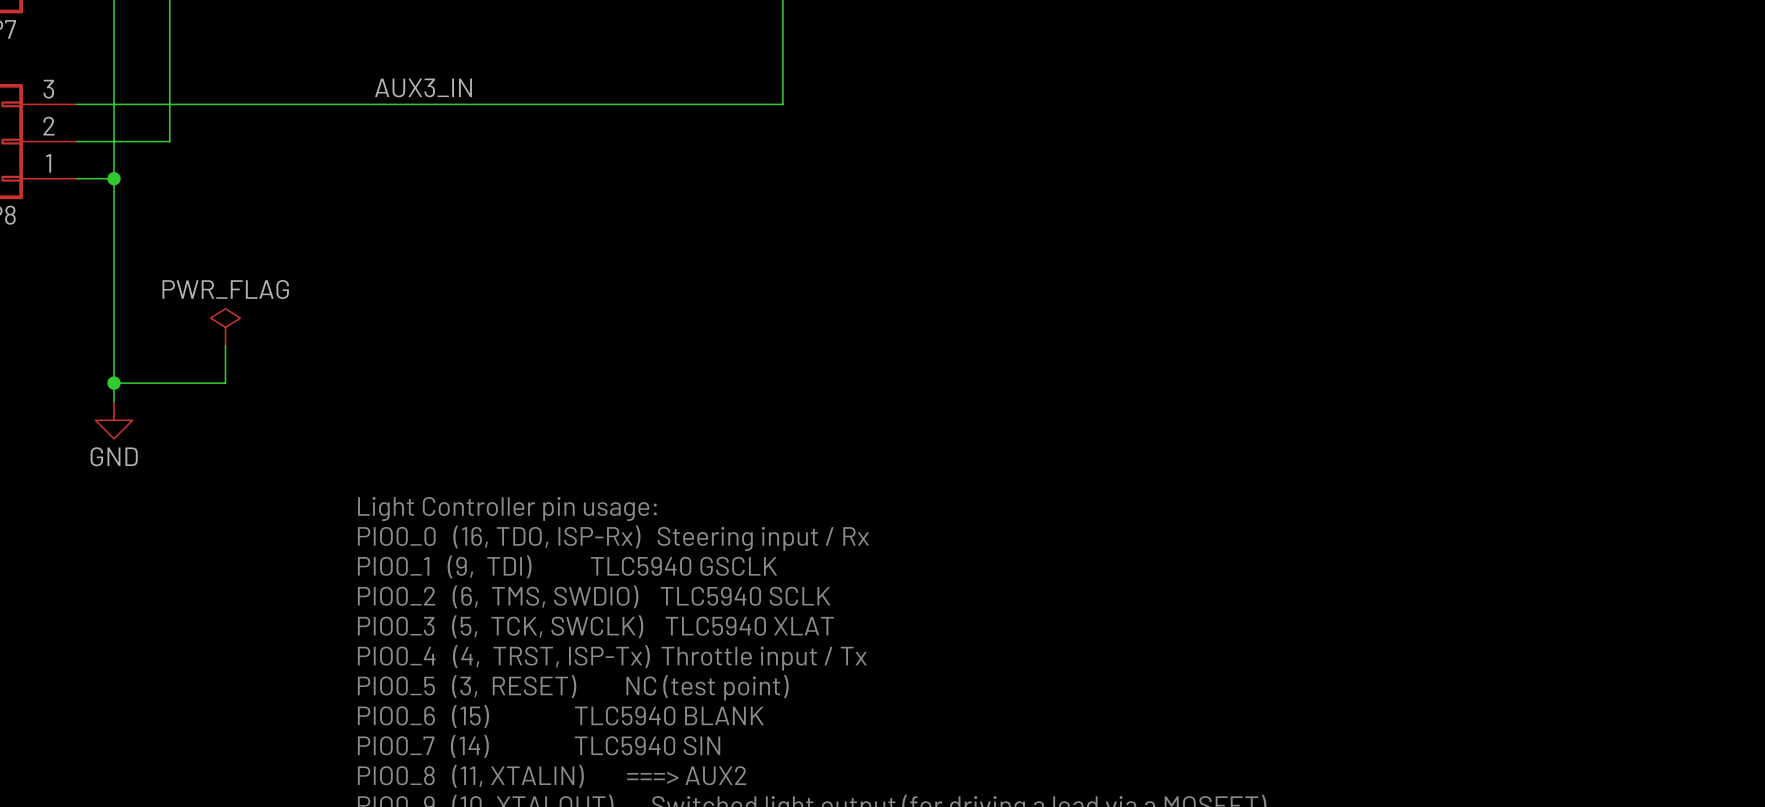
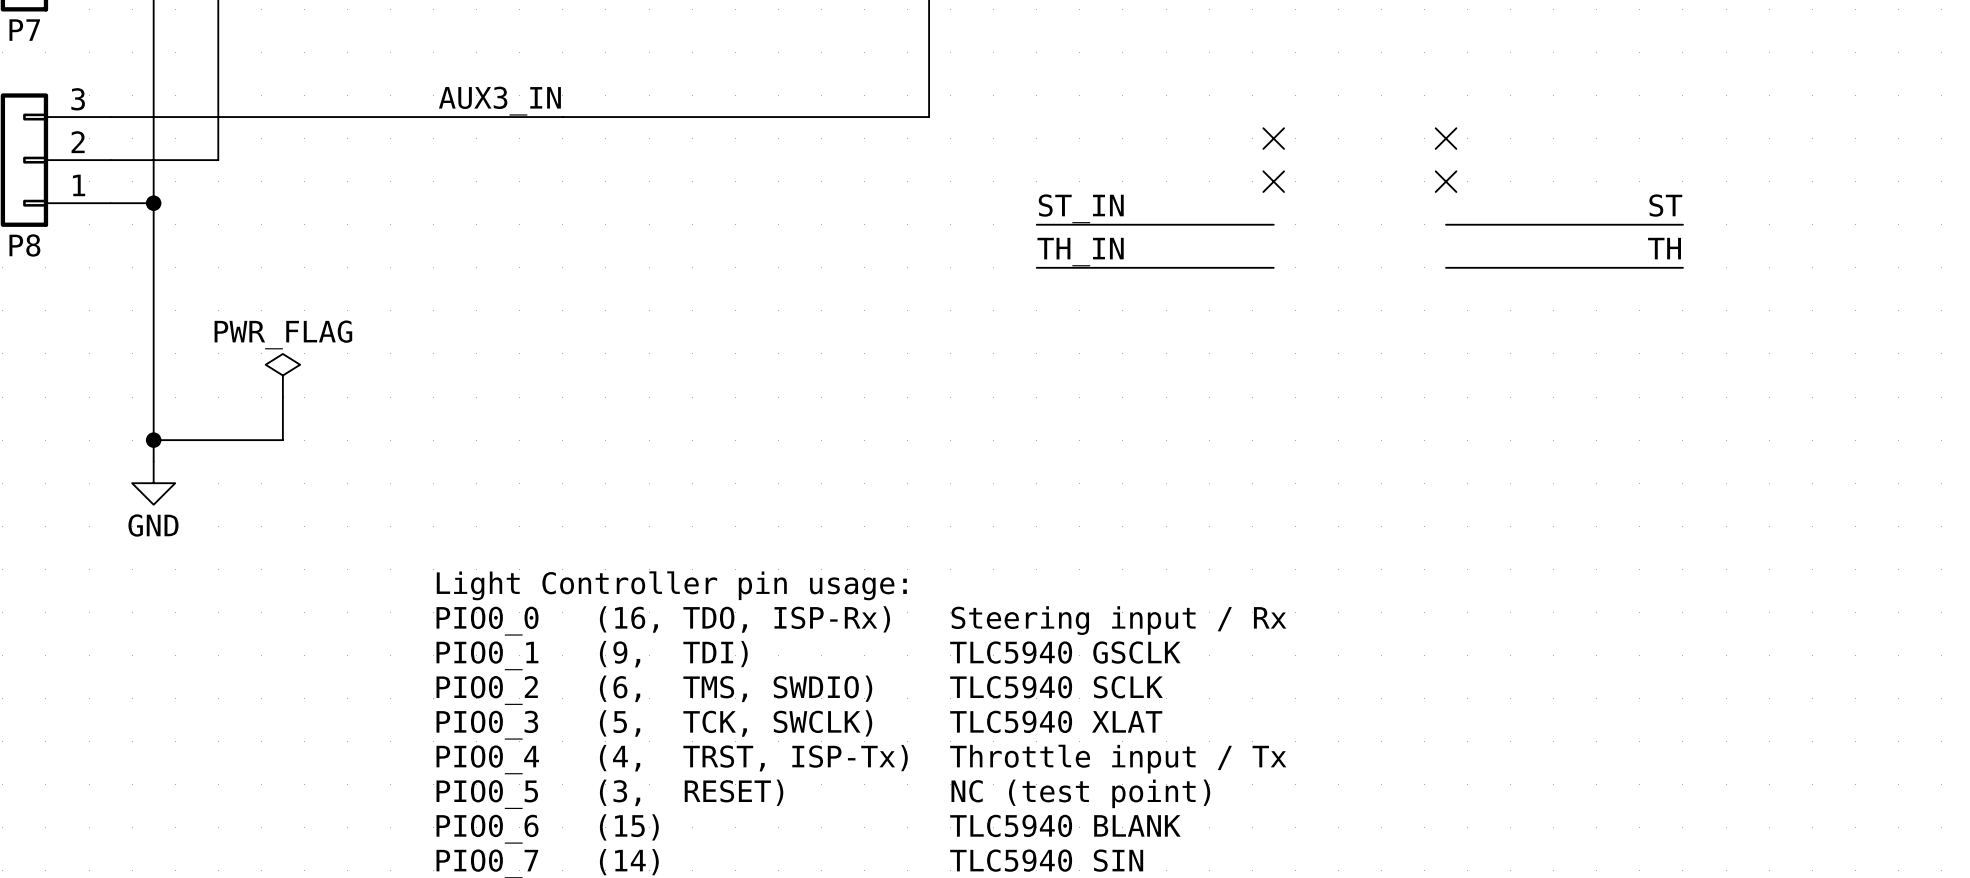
label position: AUX3_IN (423, 87) -> AUX3_IN (499, 101)
no-connect mark: none -> (1273, 138)
no-connect mark: none -> (1446, 138)
no-connect mark: none -> (1273, 181)
no-connect mark: none -> (1446, 181)
label: none -> ST_IN (1081, 208)
label: none -> ST (1665, 205)
wire: none -> (1036, 224) (1273, 224)
wire: none -> (1446, 224) (1682, 224)
label: none -> TH_IN (1080, 252)
label: none -> TH (1664, 248)
wire: none -> (1036, 267) (1273, 267)
wire: none -> (1446, 267) (1682, 267)

